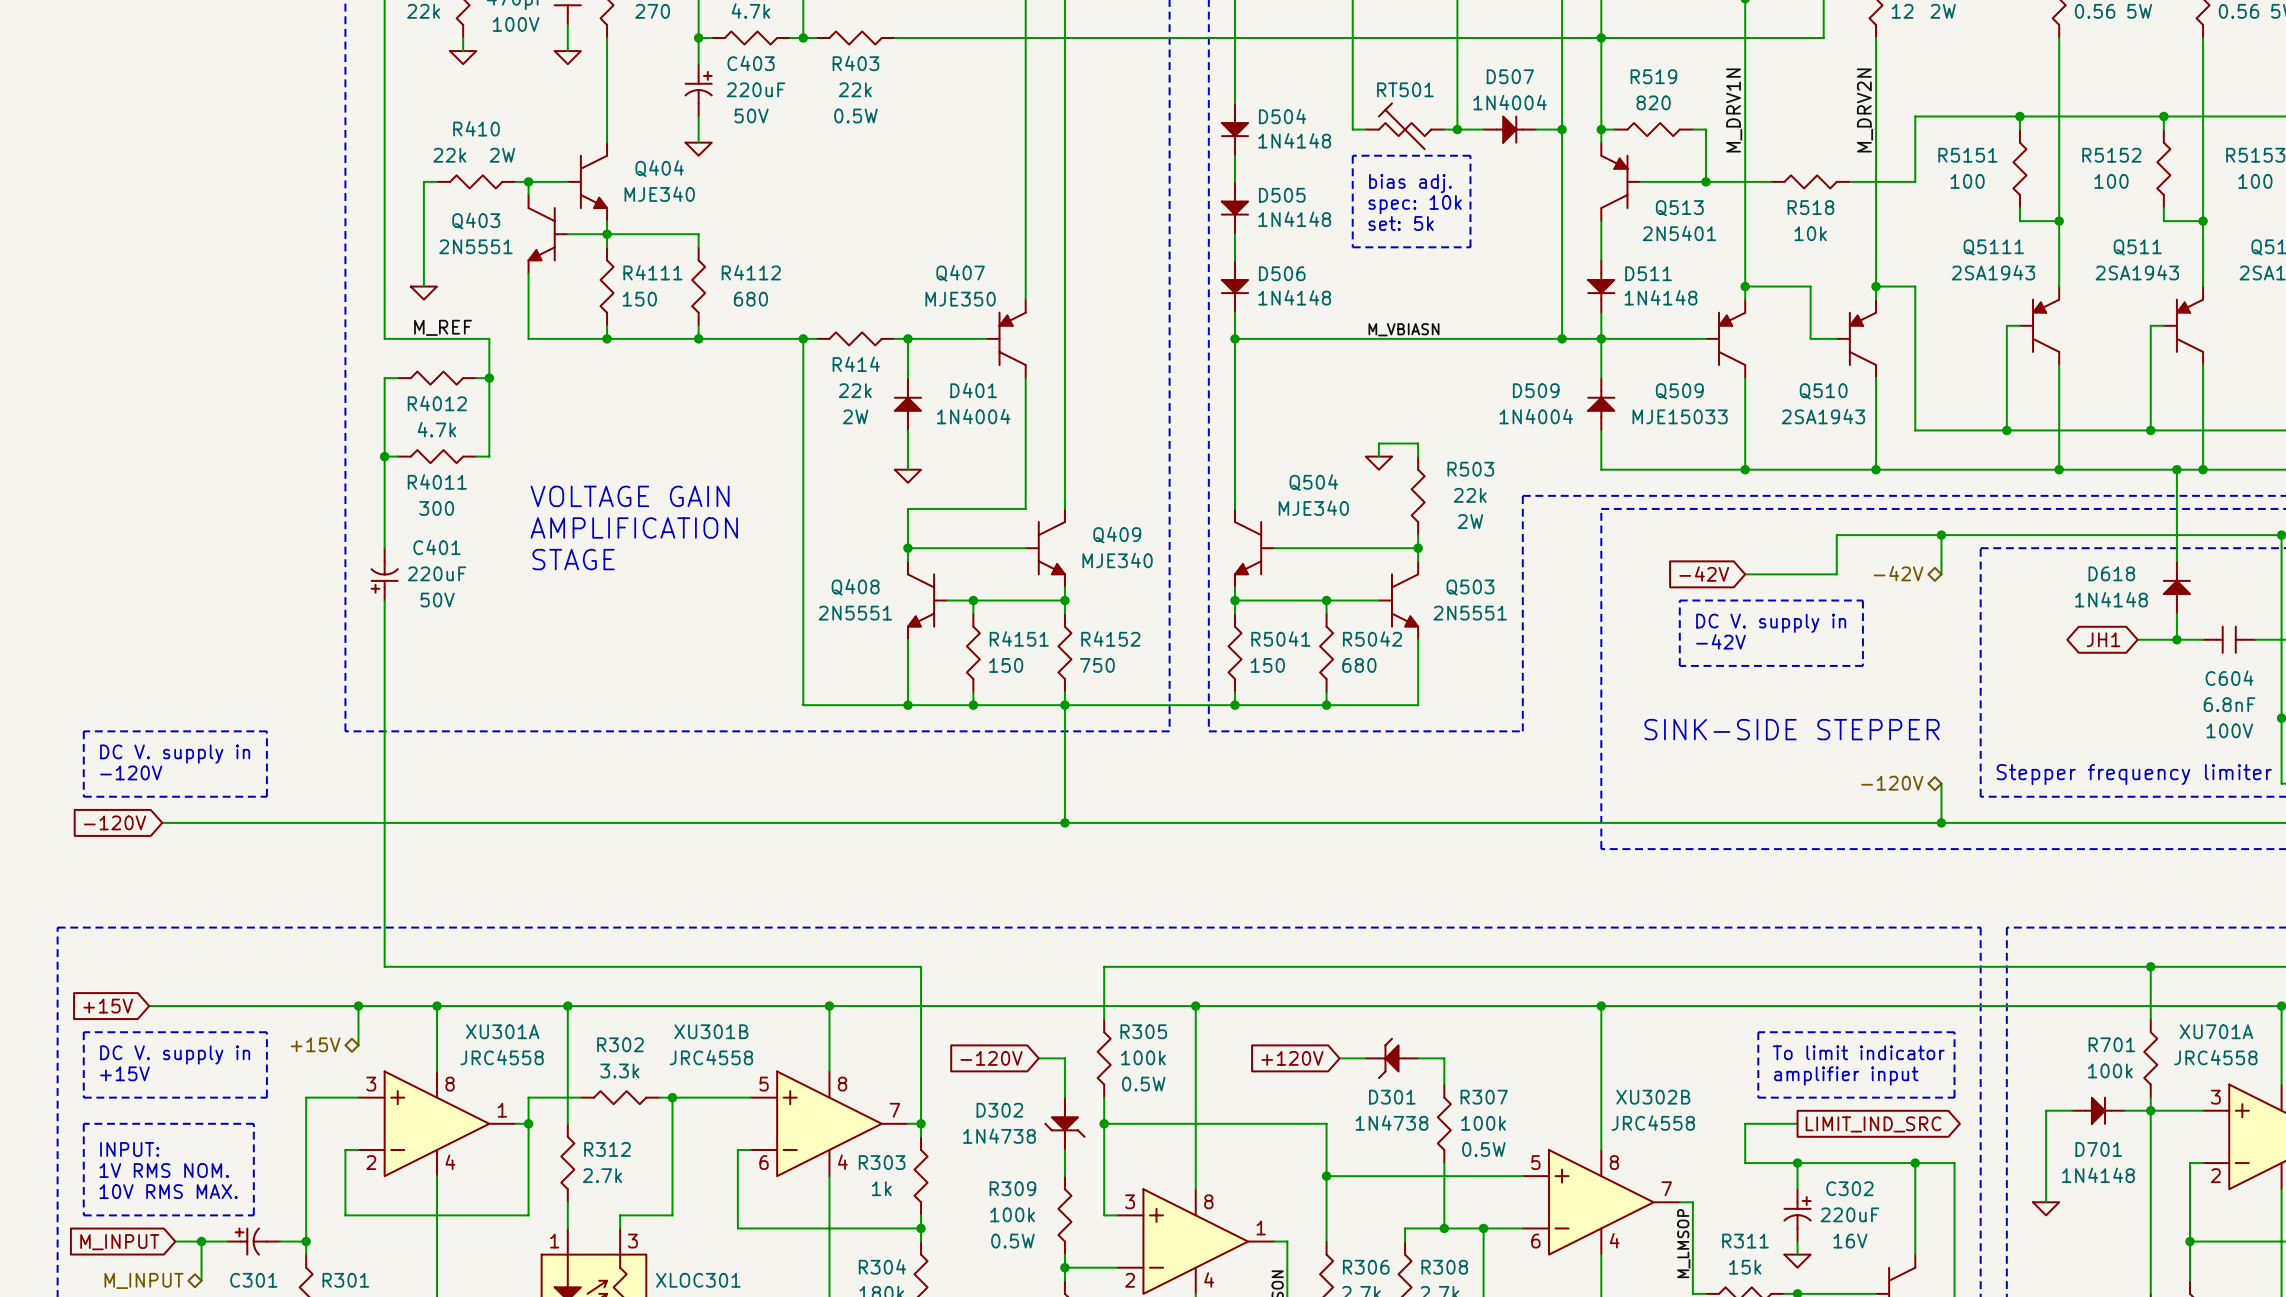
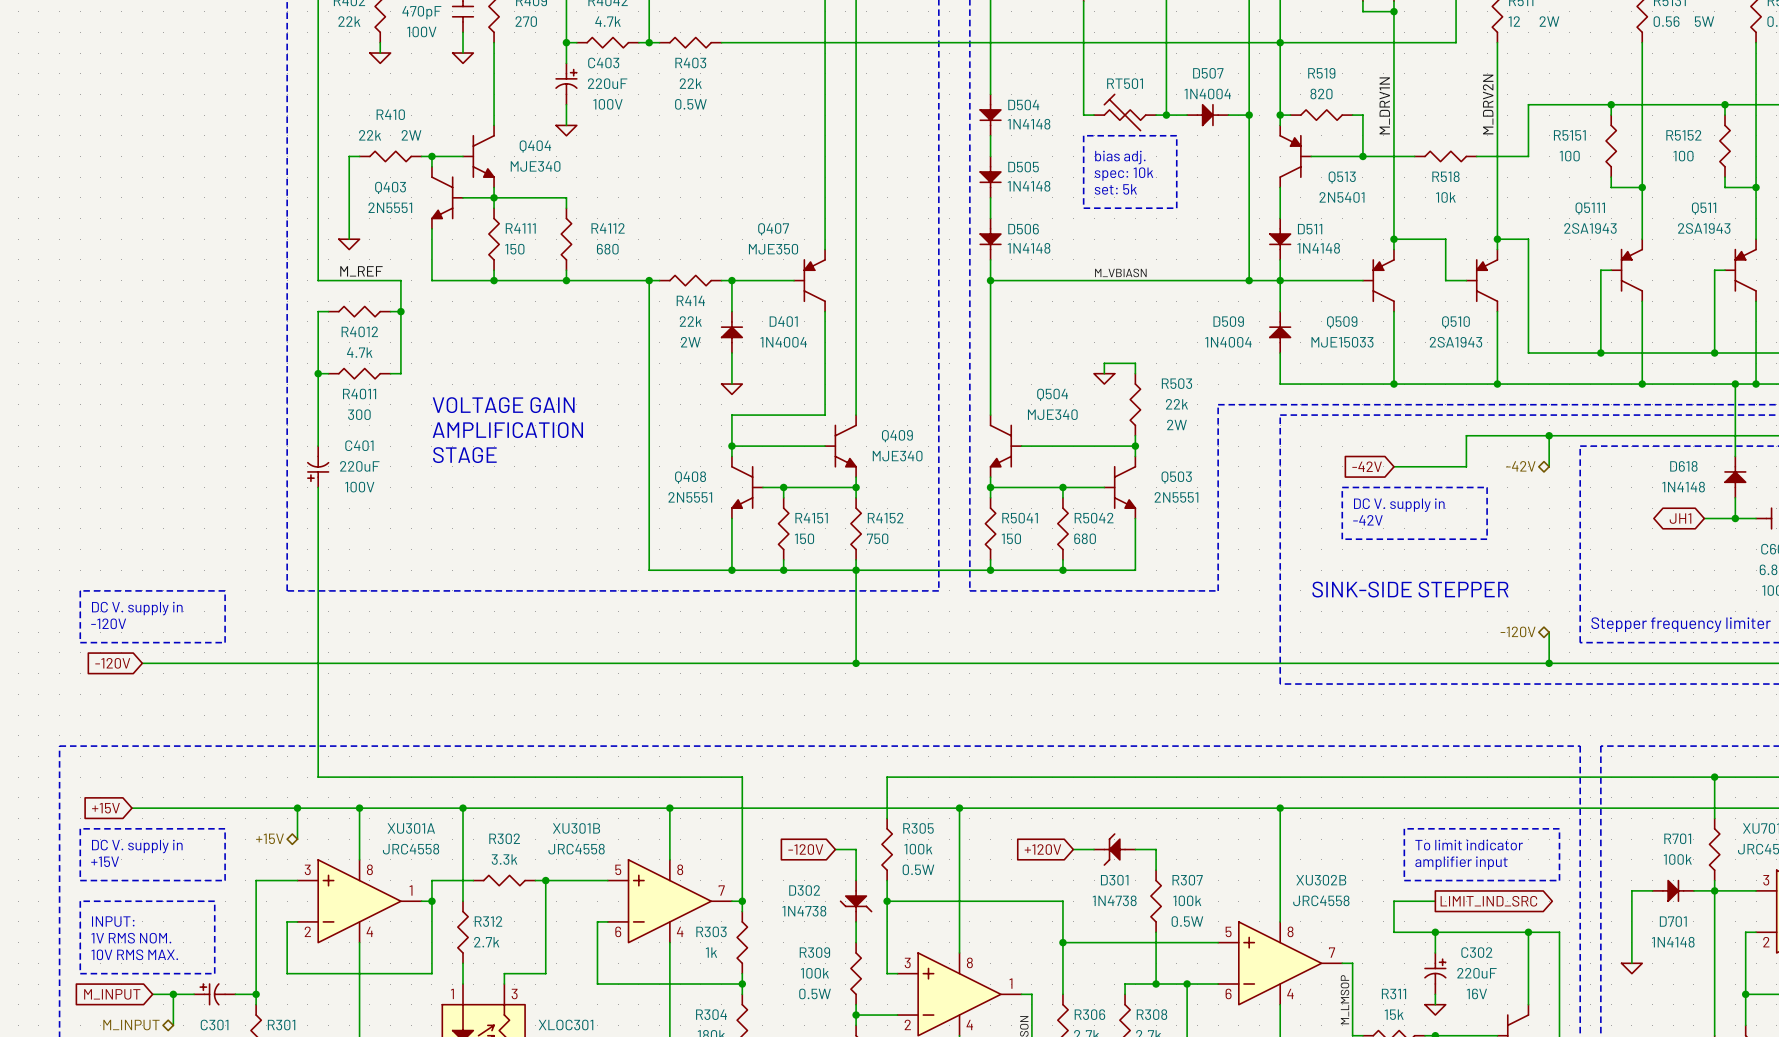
C403 text: 50V (751, 115) -> 100V (608, 104)
C401 text: 50V (437, 600) -> 100V (359, 487)

